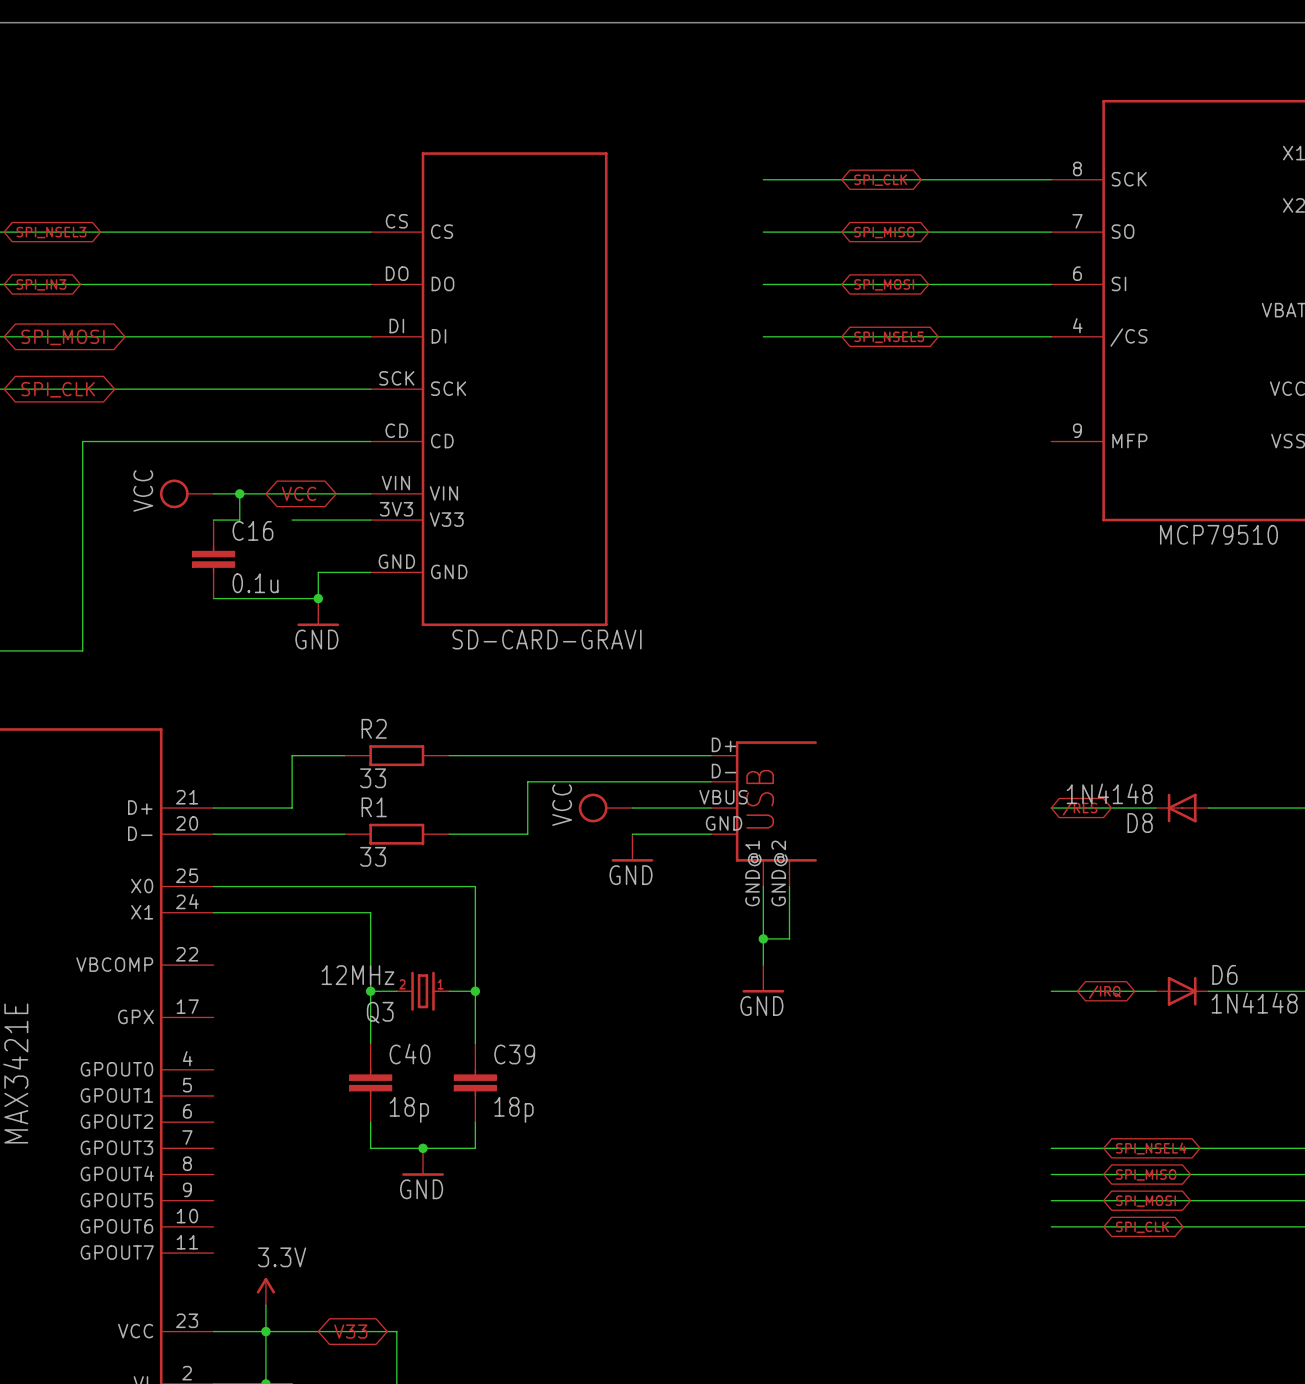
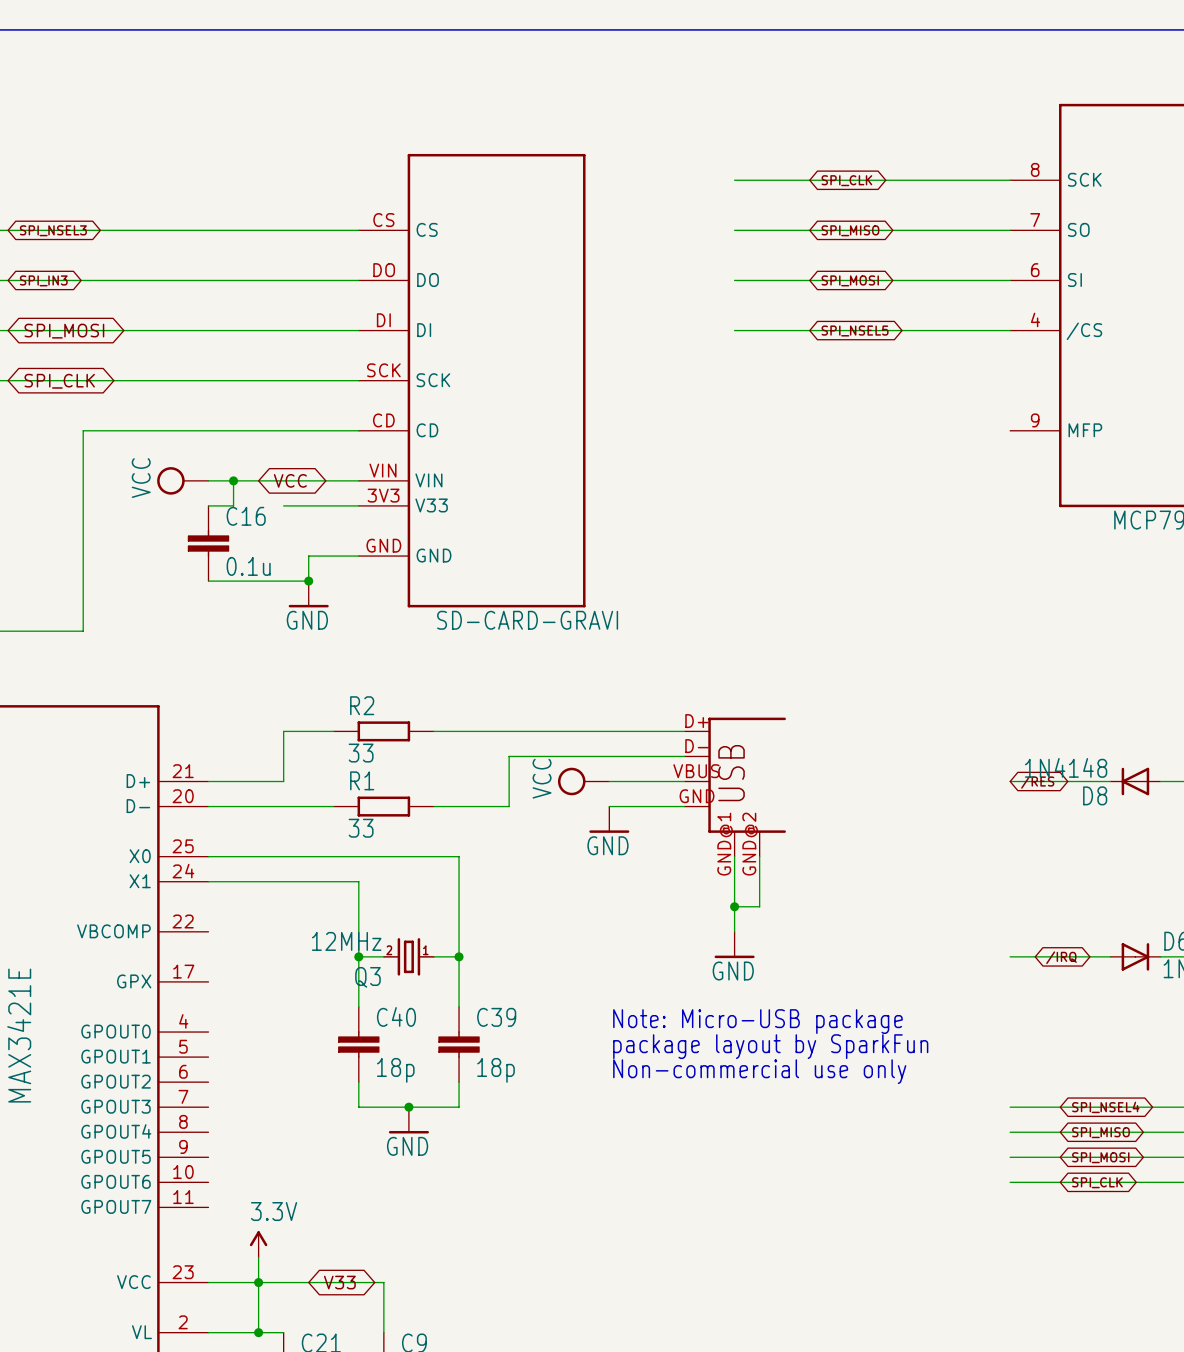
text: none -> Note: Micro-USB package (757, 1021)
text: none -> package layout by SparkFun (770, 1046)
text: none -> Non-commercial use only (759, 1071)

